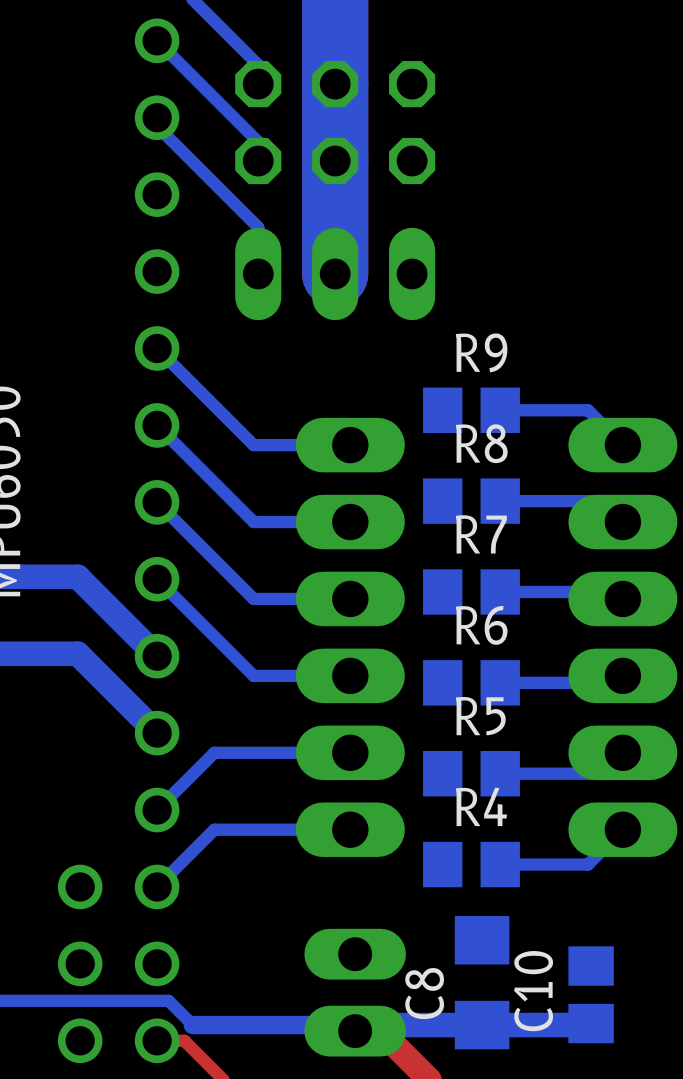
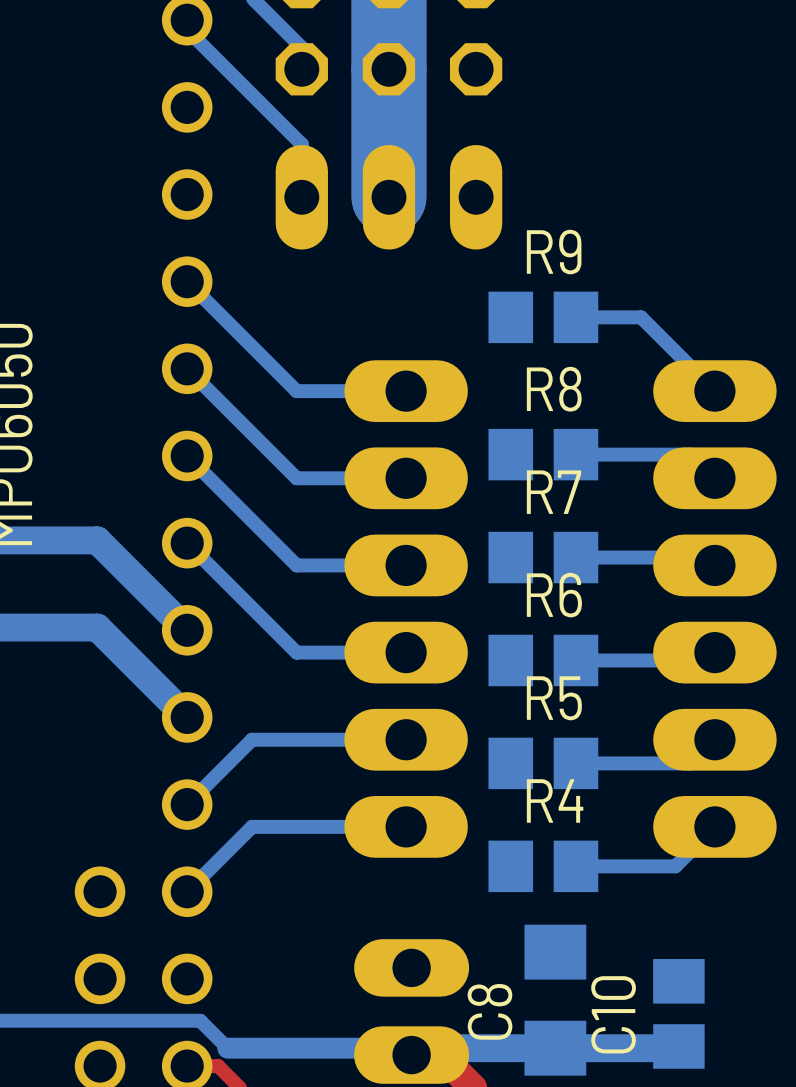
R9 position: (471, 410) -> (543, 317)
bottom track: (588, 410) (500, 410) -> (675, 351) (641, 317) (575, 317)

